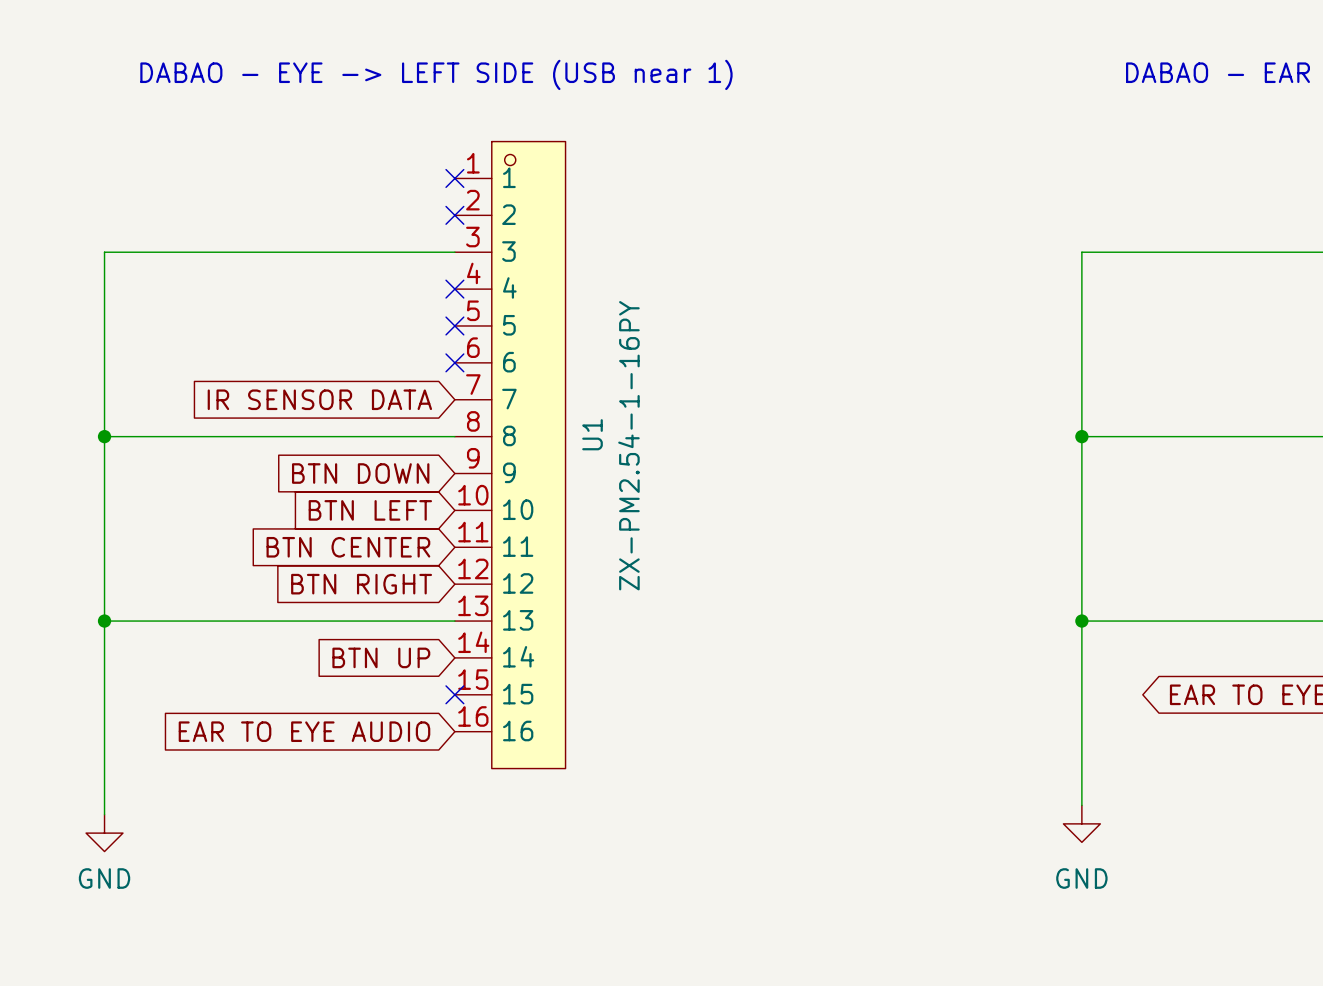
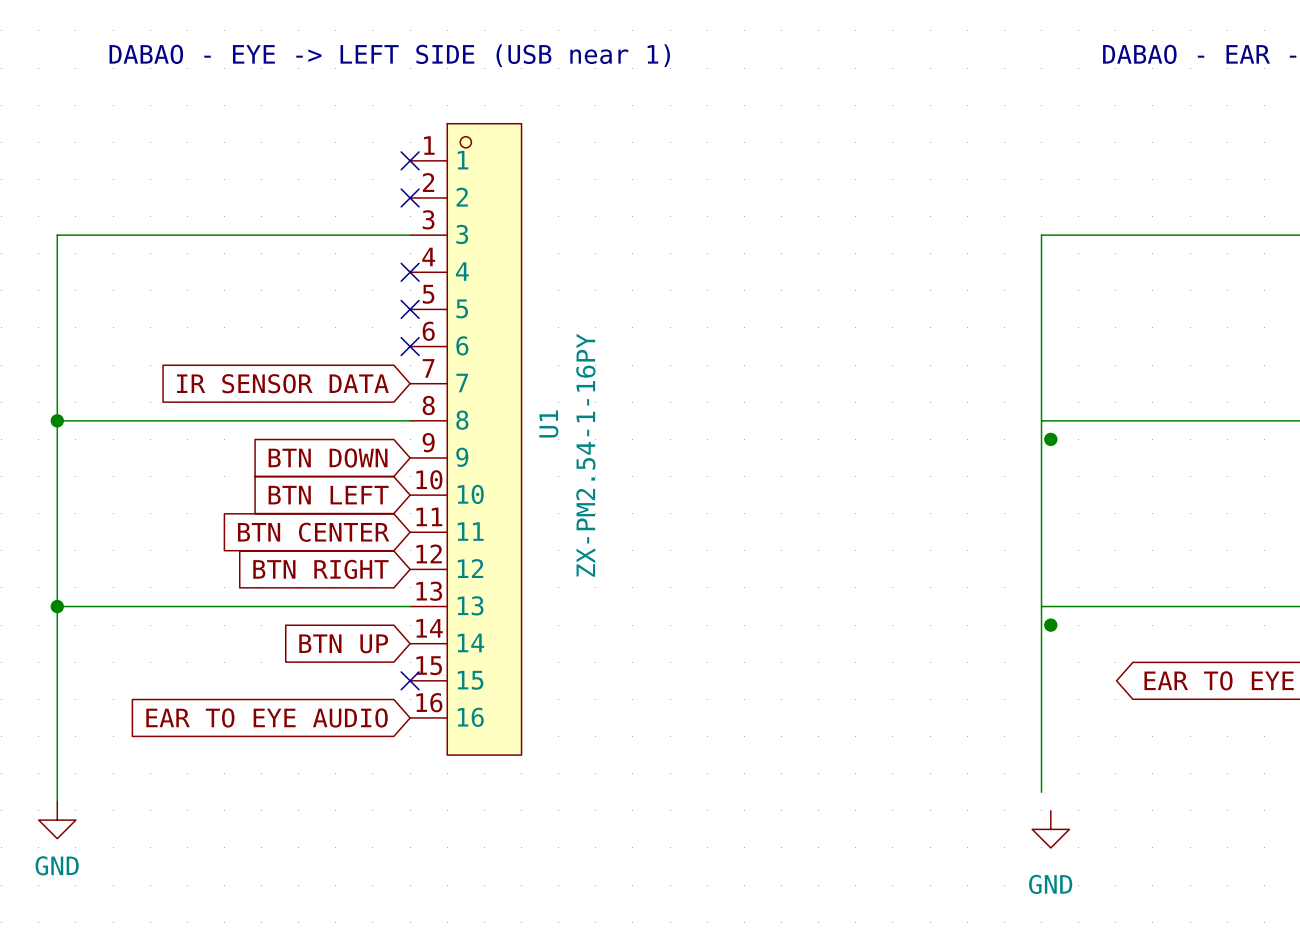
junction position: (1081, 436) -> (1050, 439)
junction position: (1081, 621) -> (1050, 625)
power symbol position: GND (1081, 823) -> GND (1050, 829)

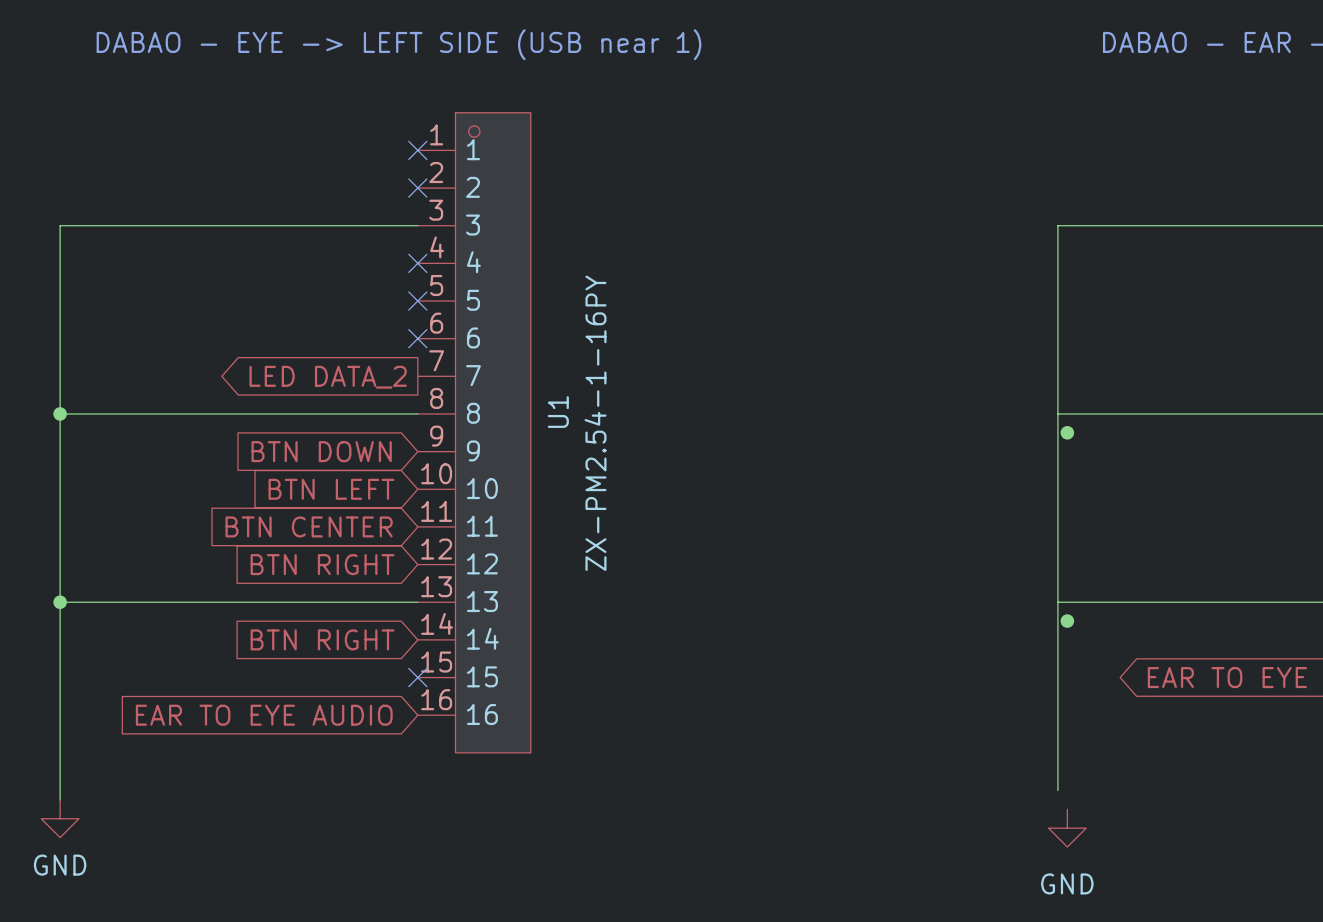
global label shape: input (282, 383) -> output (328, 377)
global label: IR SENSOR DATA (282, 383) -> LED DATA_2 (328, 377)
global label: BTN UP (343, 643) -> BTN RIGHT (322, 639)

